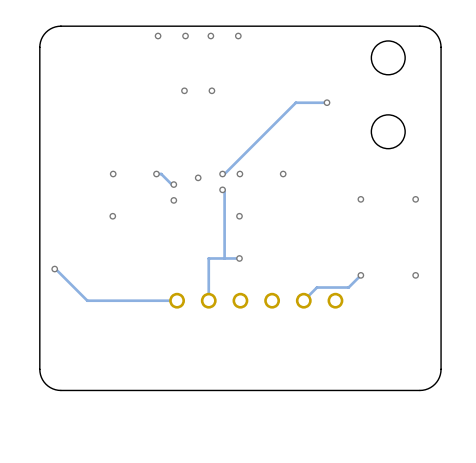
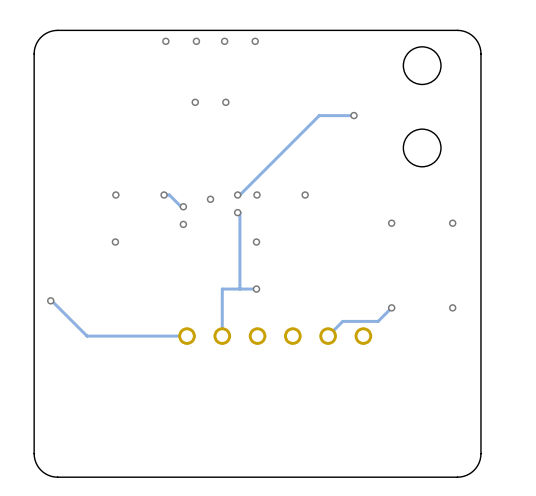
board edge: (441, 369) (439, 377) (434, 384) (428, 388) (419, 390) (60, 390) (52, 388) (46, 384) (41, 377) (39, 369) -> (480, 412) (479, 462) (469, 474) (457, 477) (54, 476) (41, 470) (34, 459) (34, 412)

